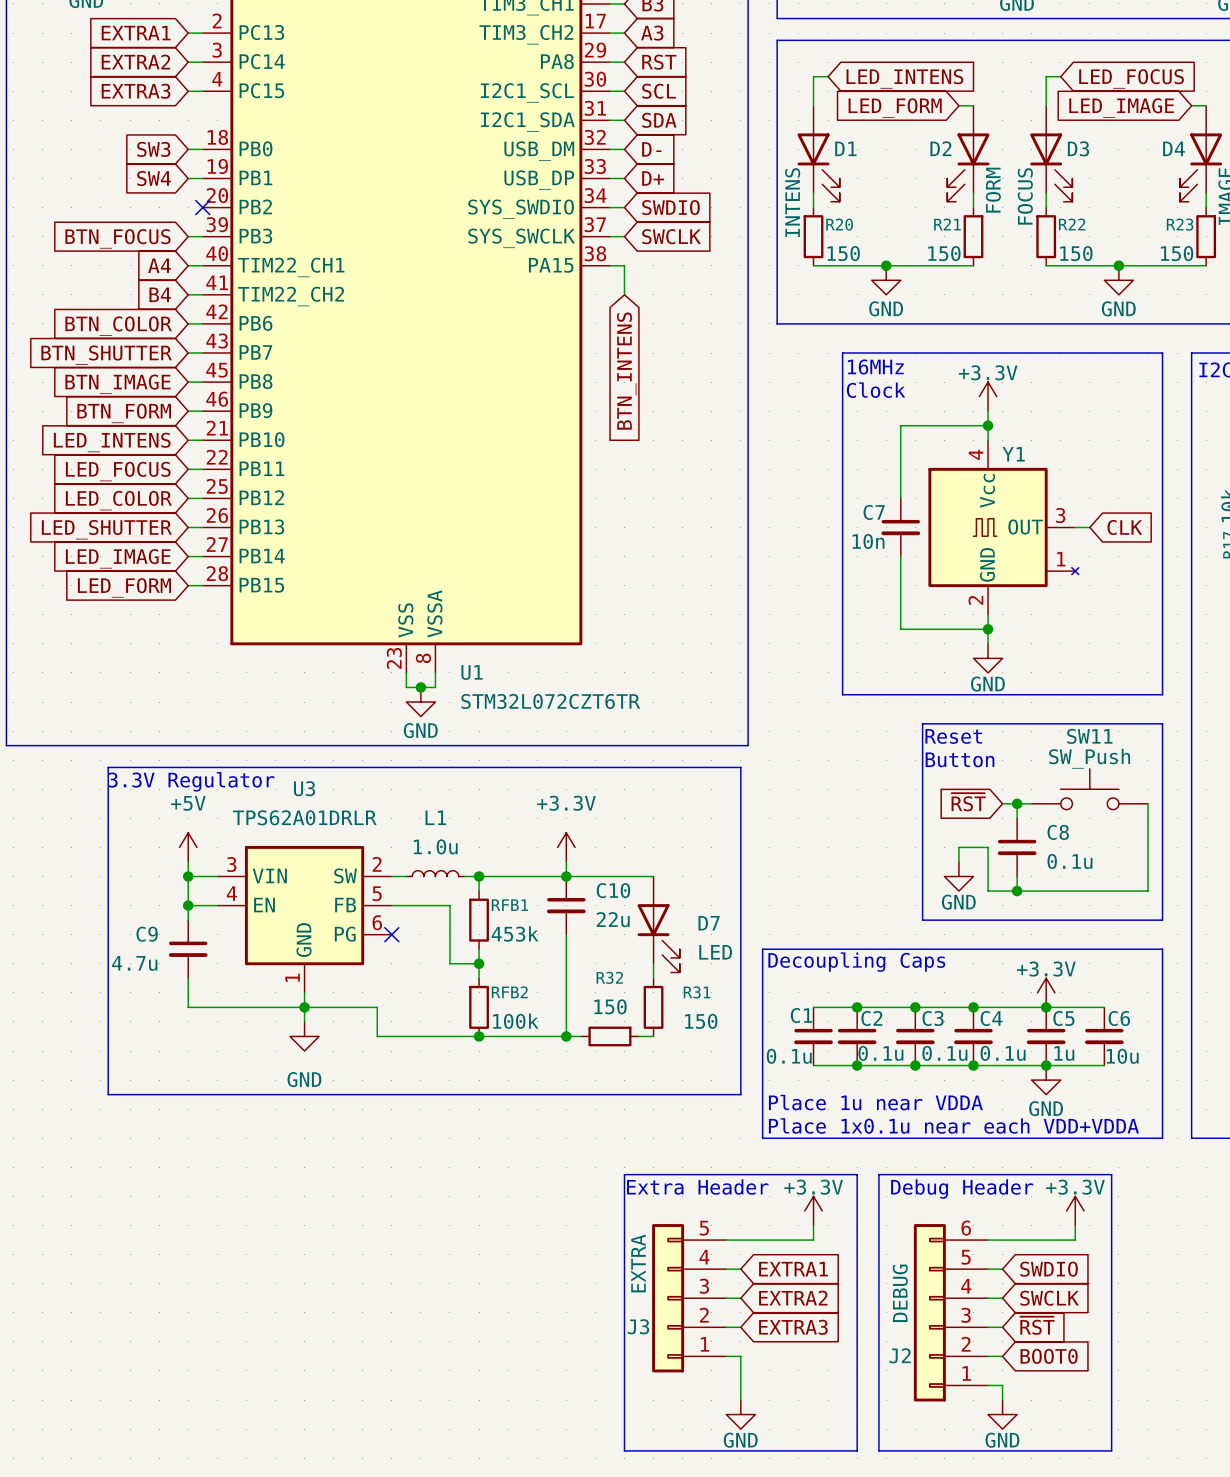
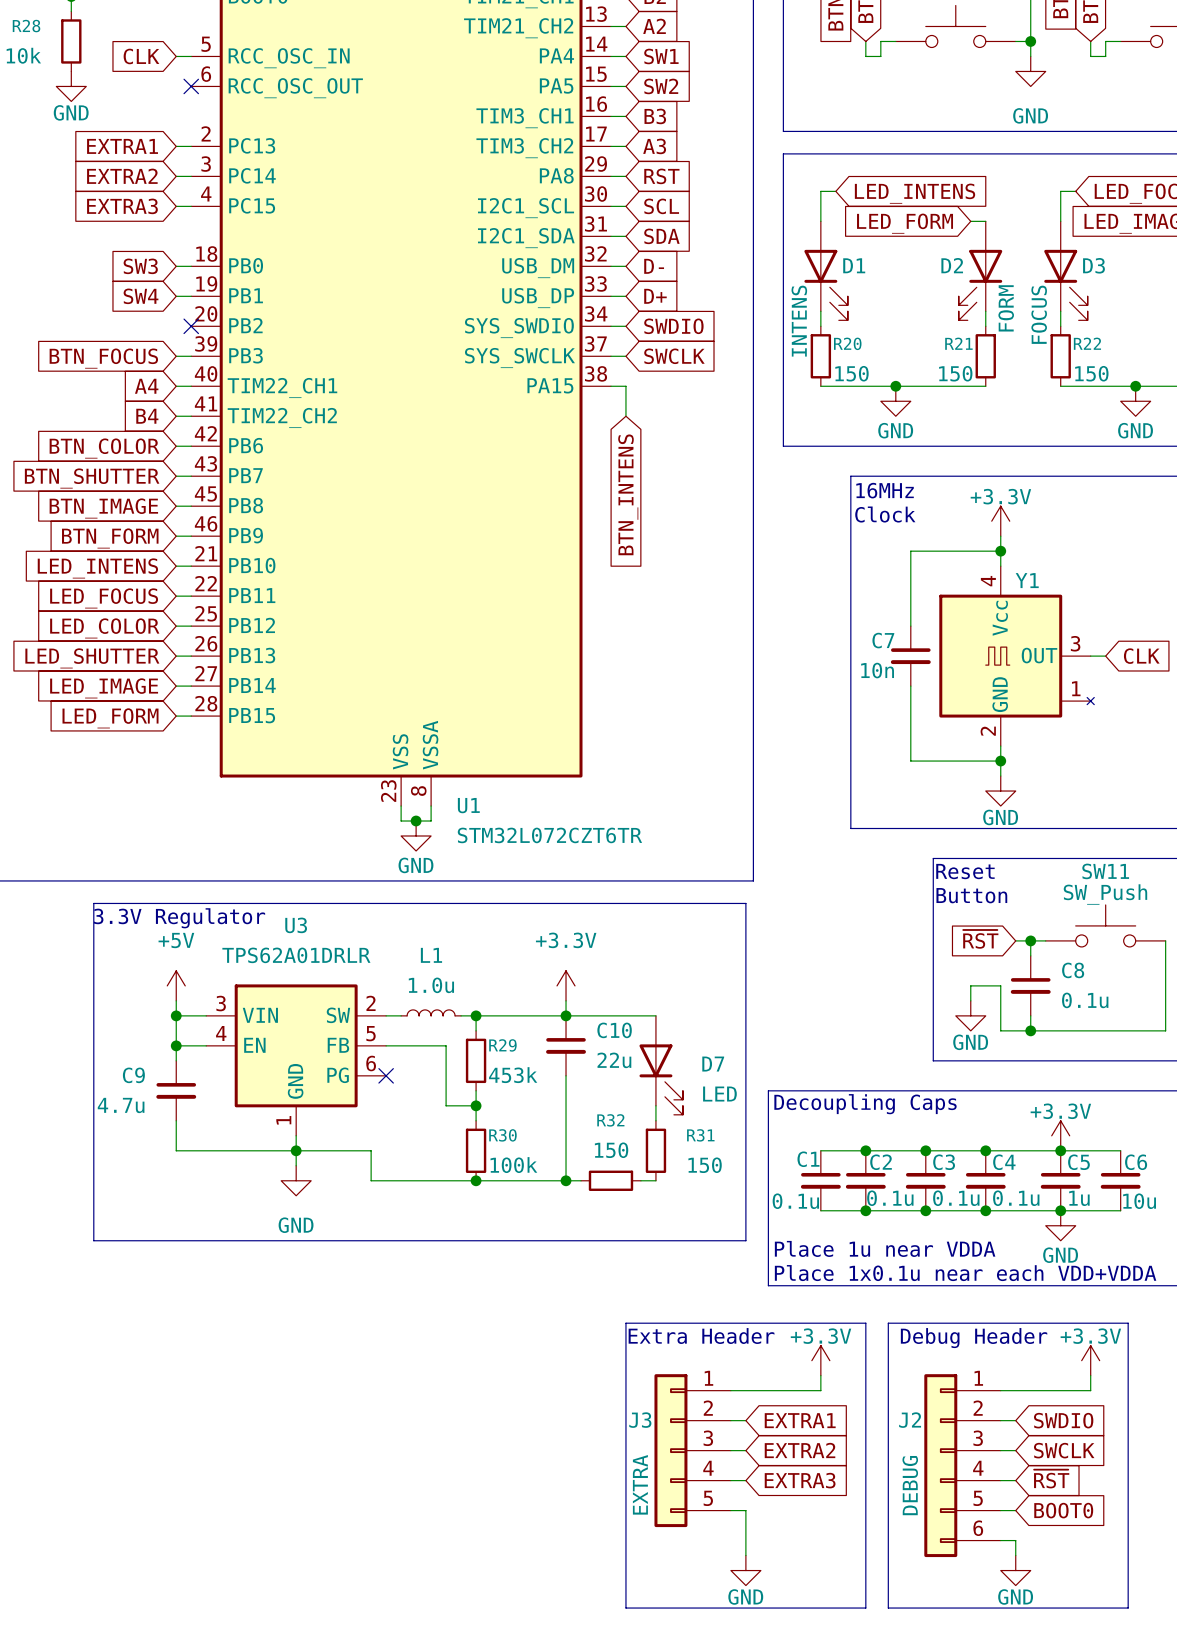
RFB1 name: RFB1 (509, 905) -> R29 (502, 1045)
RFB2 name: RFB2 (509, 992) -> R30 (502, 1135)
J3 flip: as is (668, 1298) -> up-down (670, 1450)
J2 flip: as is (929, 1312) -> up-down (940, 1465)

